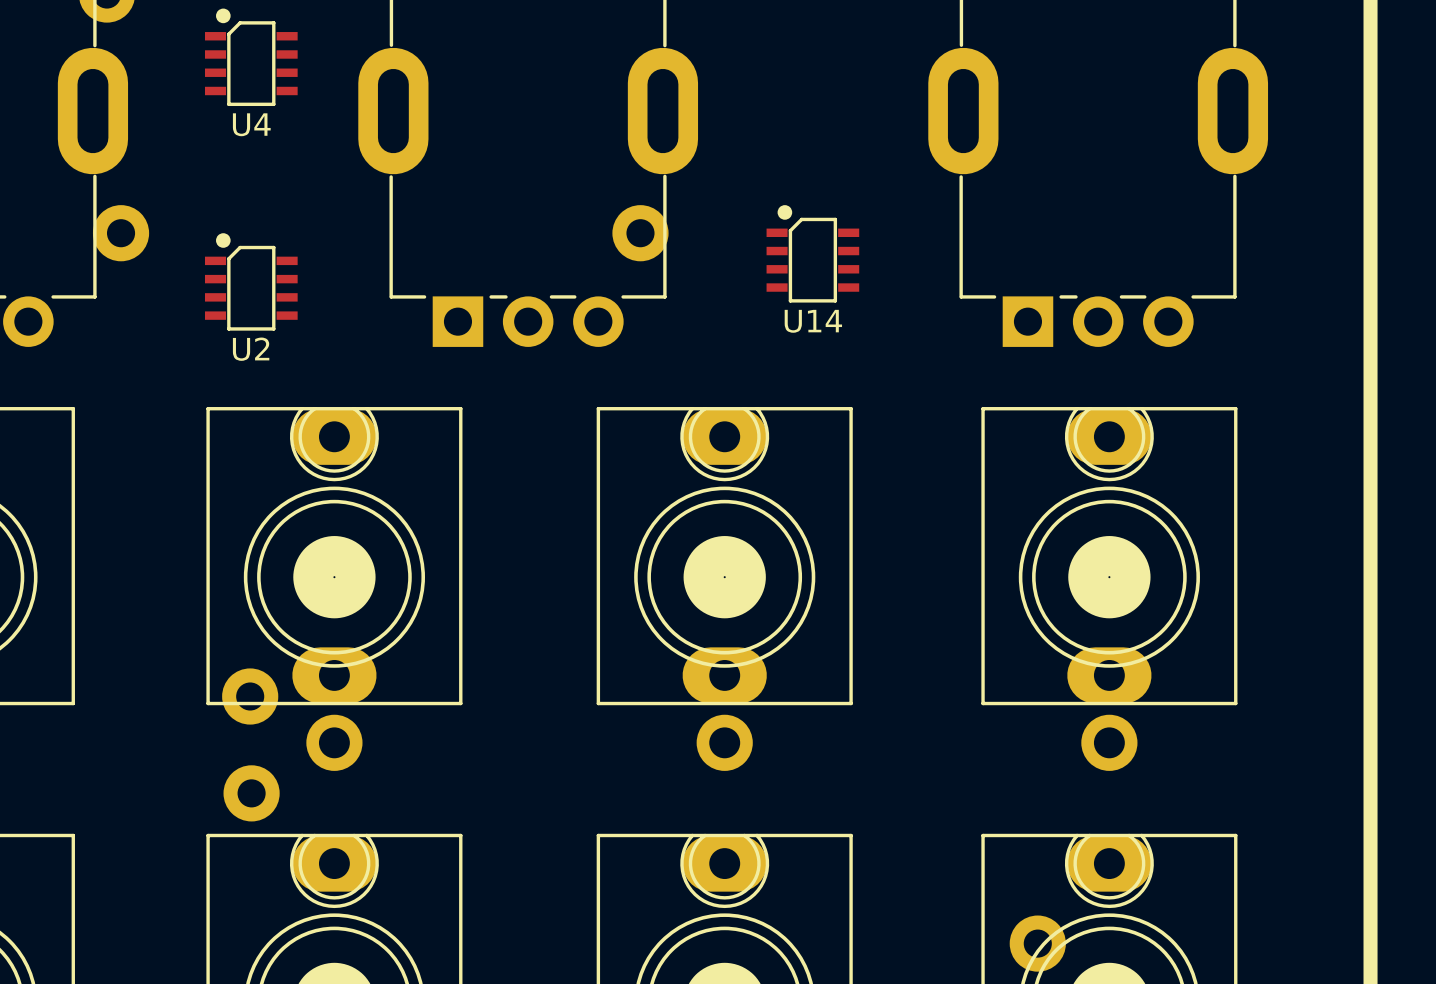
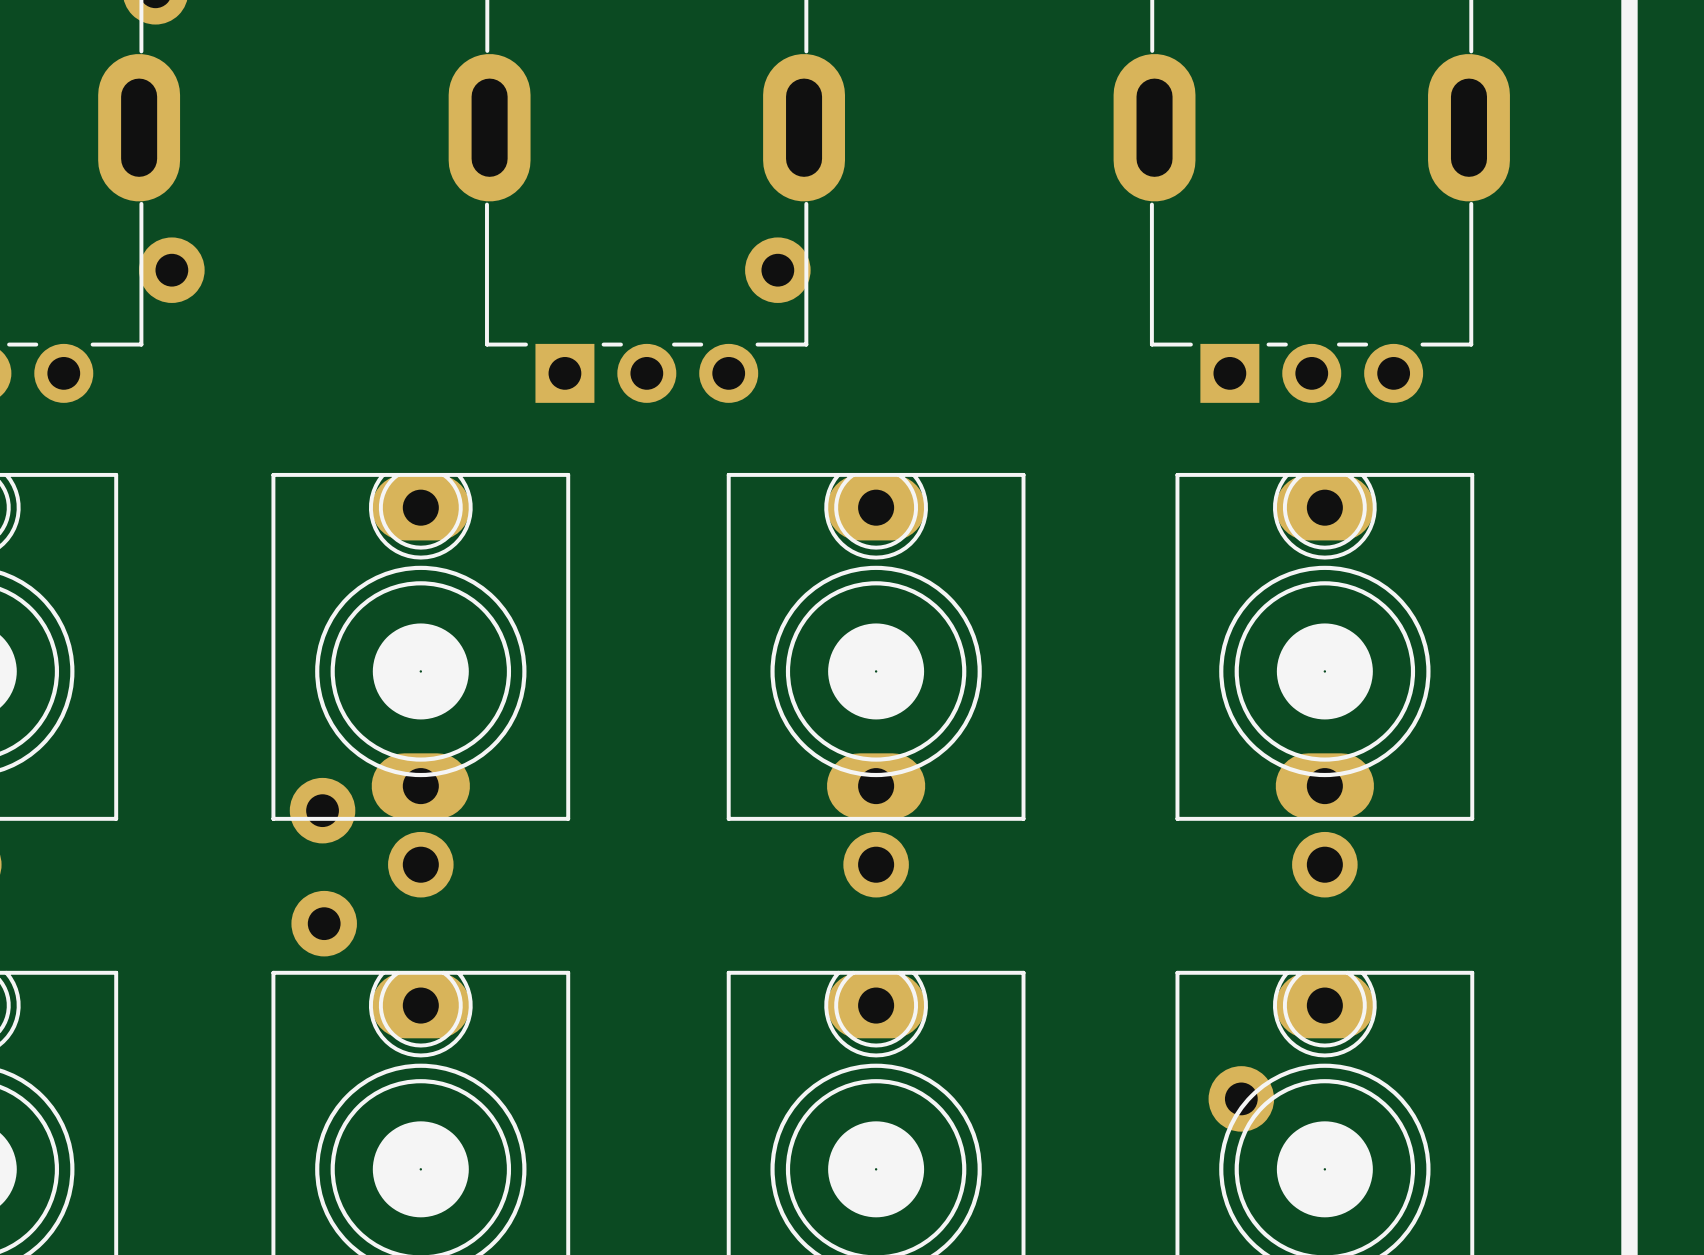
U4: (251, 57) -> none
U14: (812, 253) -> none
U2: (251, 281) -> none

